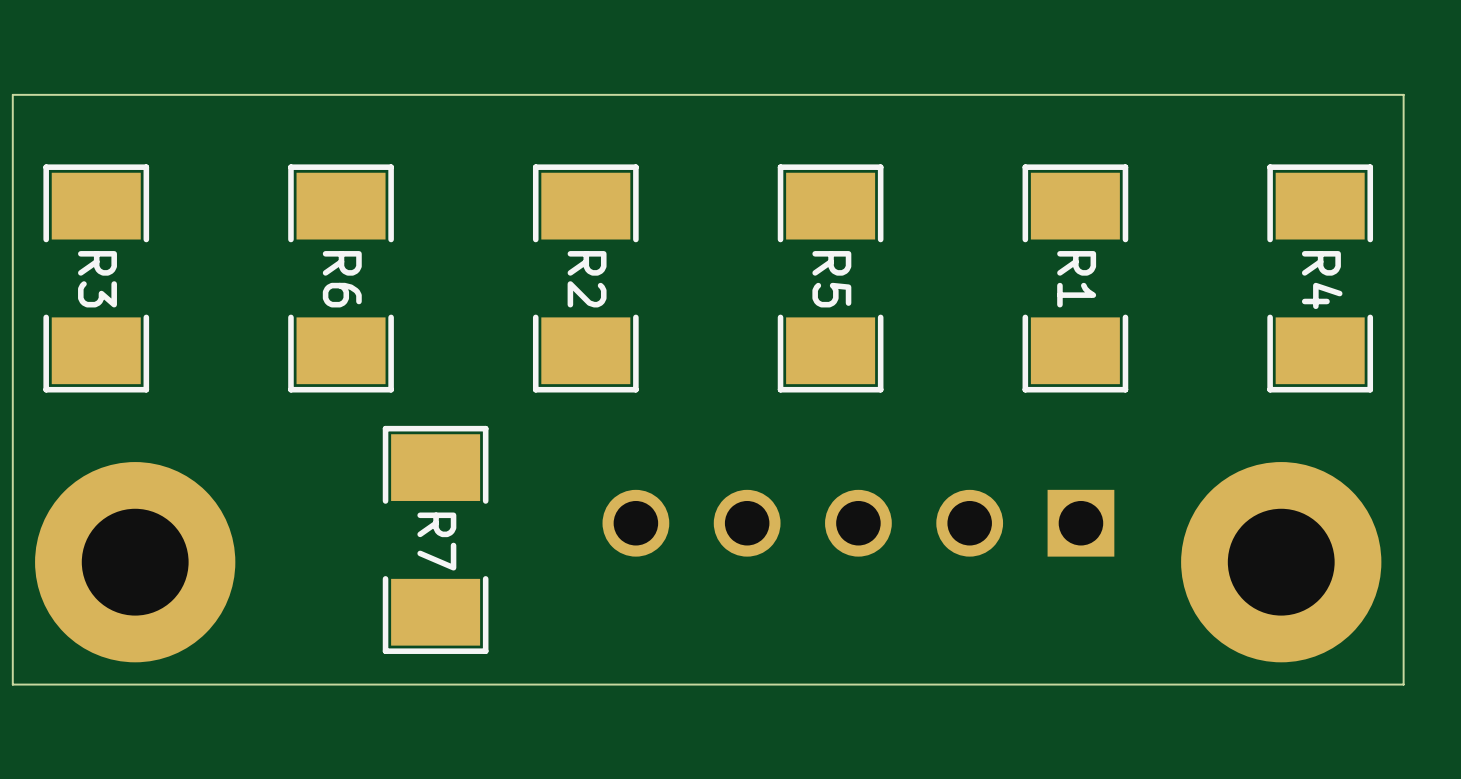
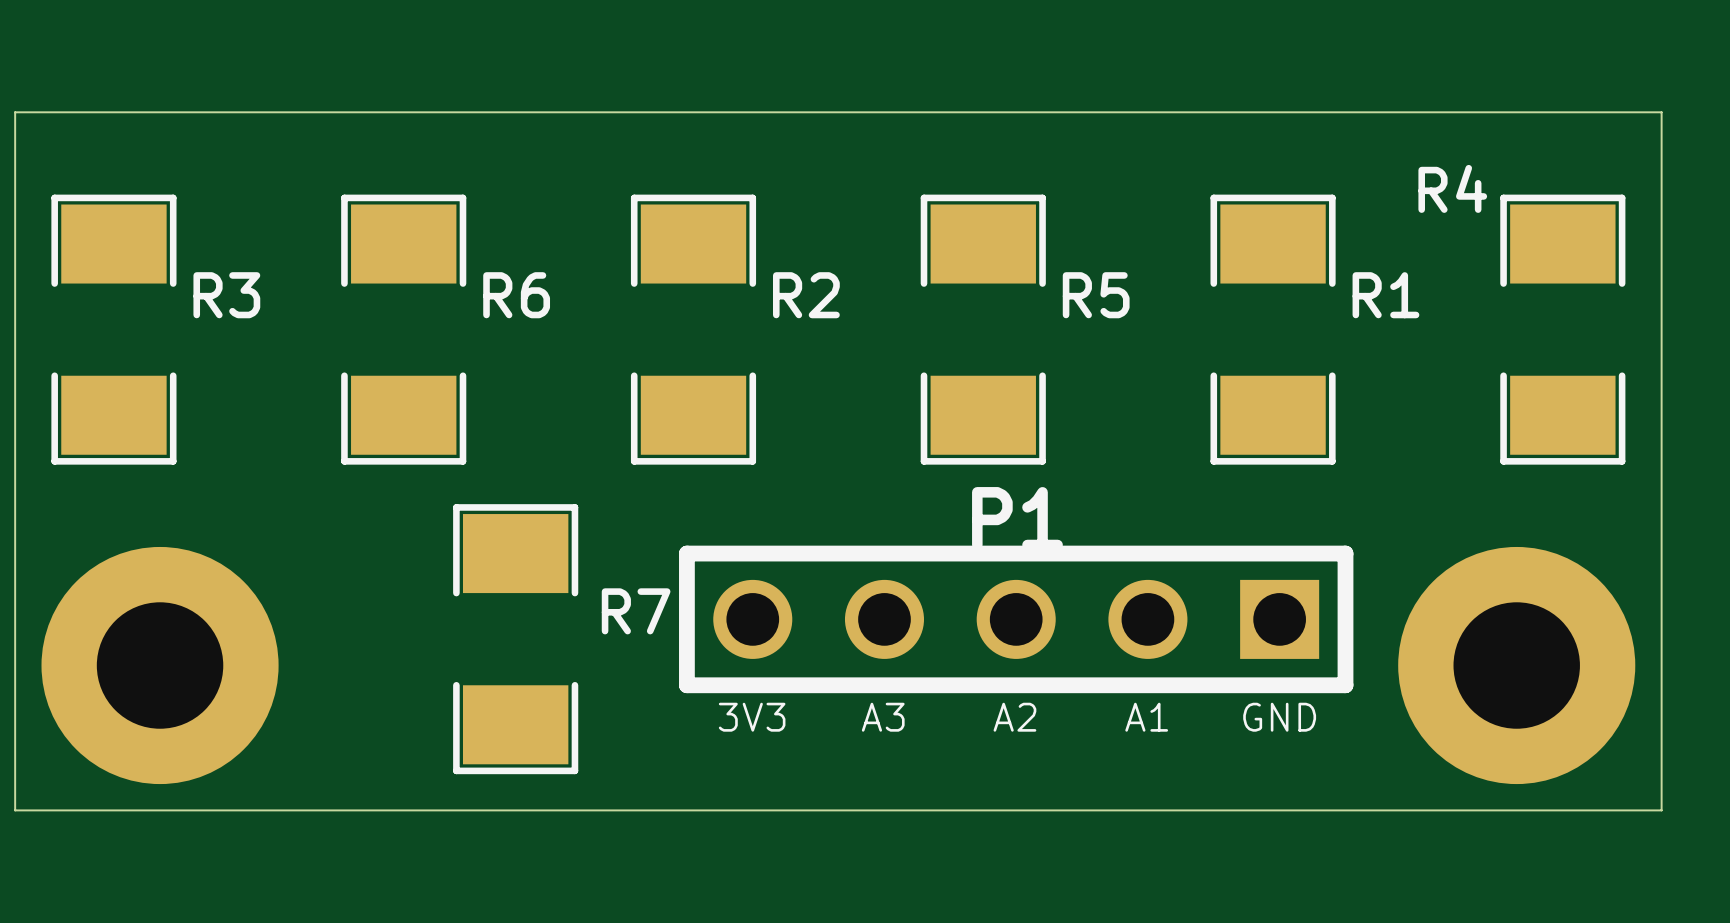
R3 name rotation: 0° (97, 279) -> 90° counterclockwise (226, 295)
R3 name position: R3 (97, 279) -> R3 (226, 295)
R6 name rotation: 0° (342, 279) -> 90° counterclockwise (516, 295)
R6 name position: R6 (342, 279) -> R6 (516, 295)
R2 name rotation: 0° (587, 279) -> 90° counterclockwise (806, 295)
R2 name position: R2 (587, 279) -> R2 (806, 295)
R5 name rotation: 0° (831, 279) -> 90° counterclockwise (1096, 295)
R5 name position: R5 (831, 279) -> R5 (1096, 295)
R1 name rotation: 0° (1076, 279) -> 90° counterclockwise (1385, 295)
R1 name position: R1 (1076, 279) -> R1 (1385, 295)
R4 name rotation: 0° (1322, 280) -> 90° counterclockwise (1452, 188)
R4 name position: R4 (1322, 280) -> R4 (1452, 188)
P1 side: top (858, 523) -> bottom (1016, 619)
R7 name rotation: 0° (436, 541) -> 90° counterclockwise (636, 611)
R7 name position: R7 (436, 541) -> R7 (636, 611)
text: none -> 3V3 (752, 717)
text: none -> A3 (883, 717)
text: none -> A2 (1014, 717)
text: none -> A1 (1146, 717)
text: none -> GND (1279, 717)

